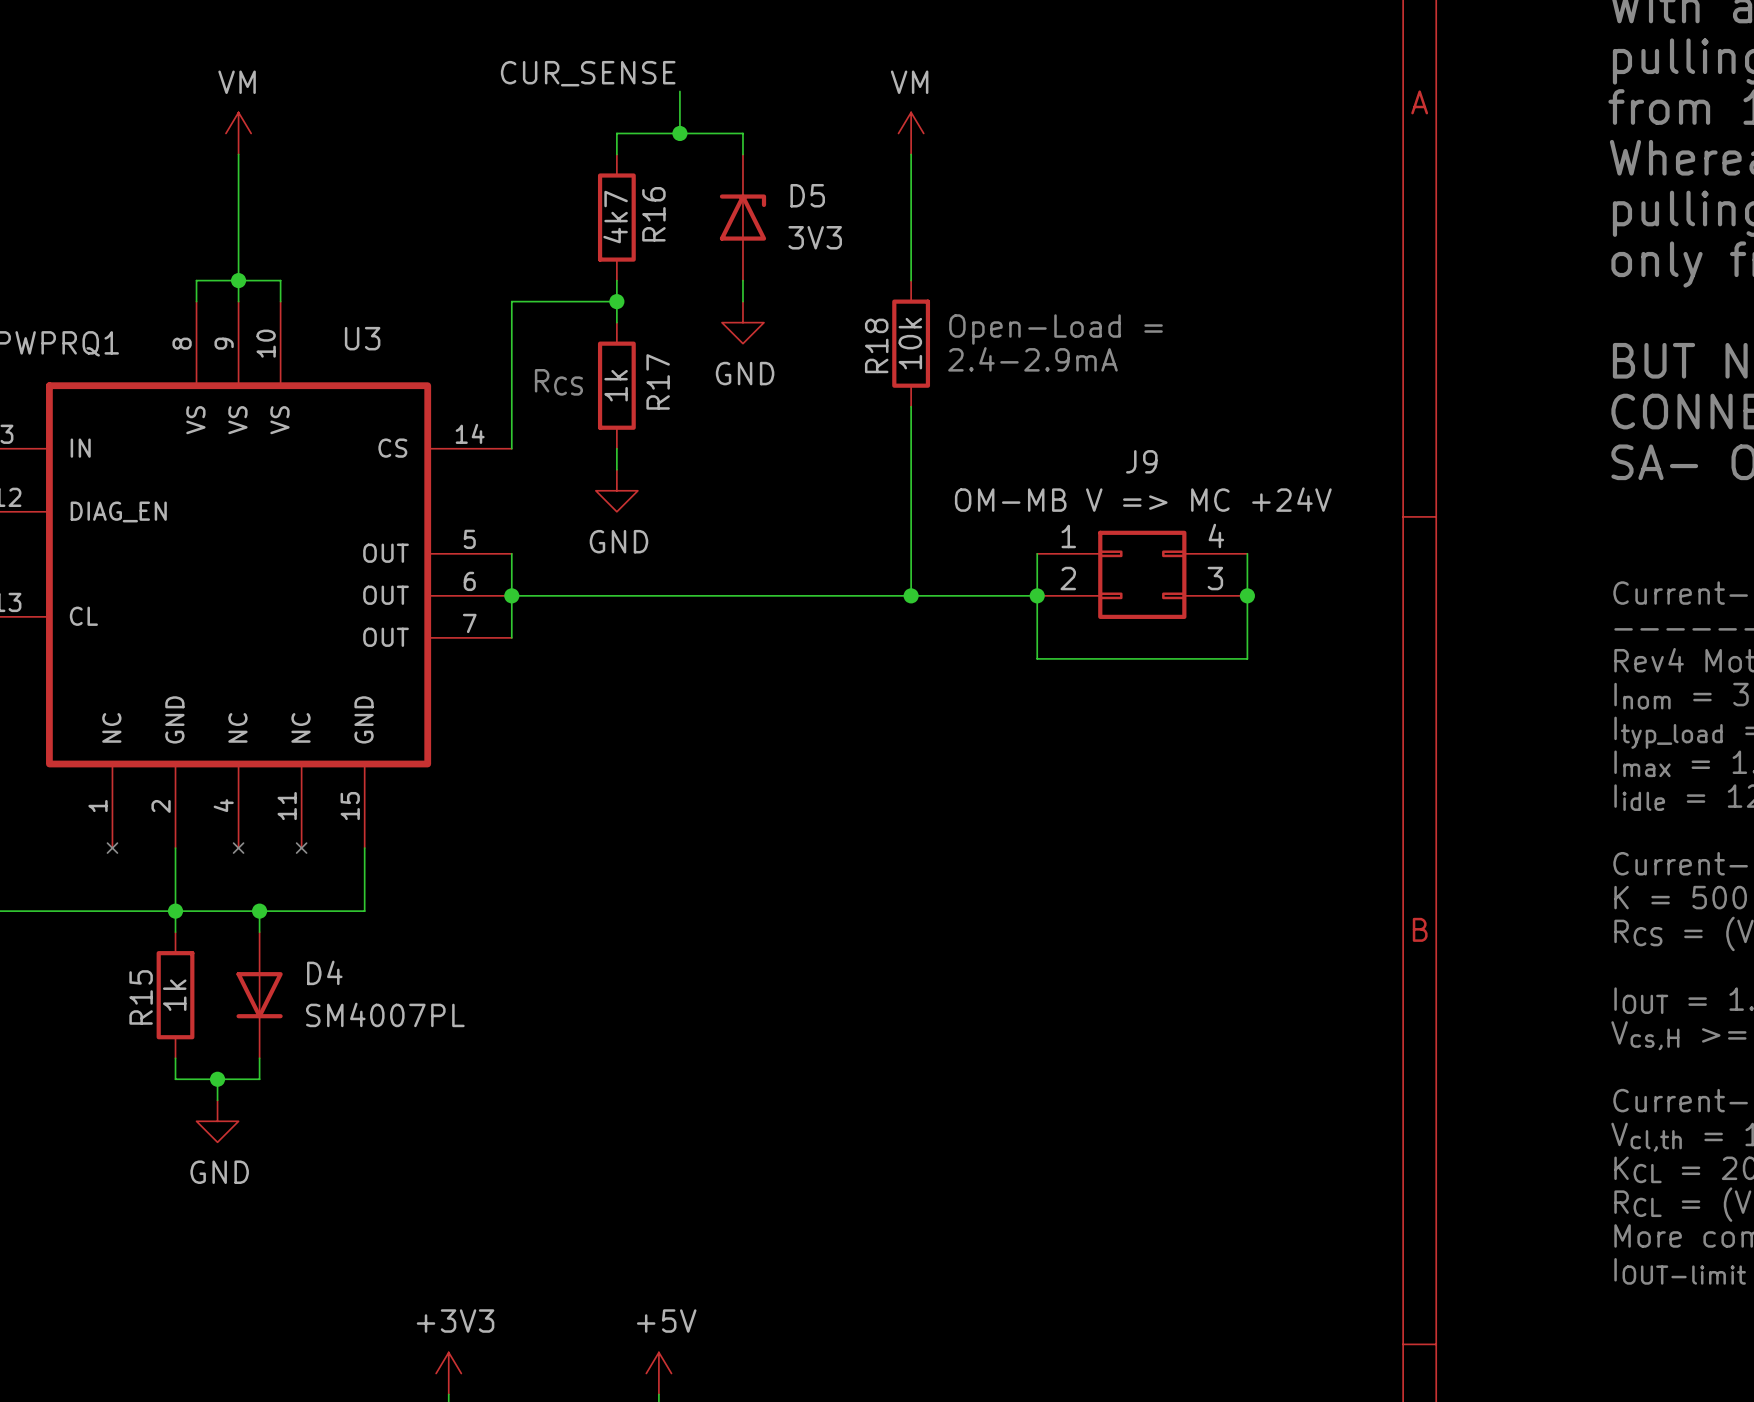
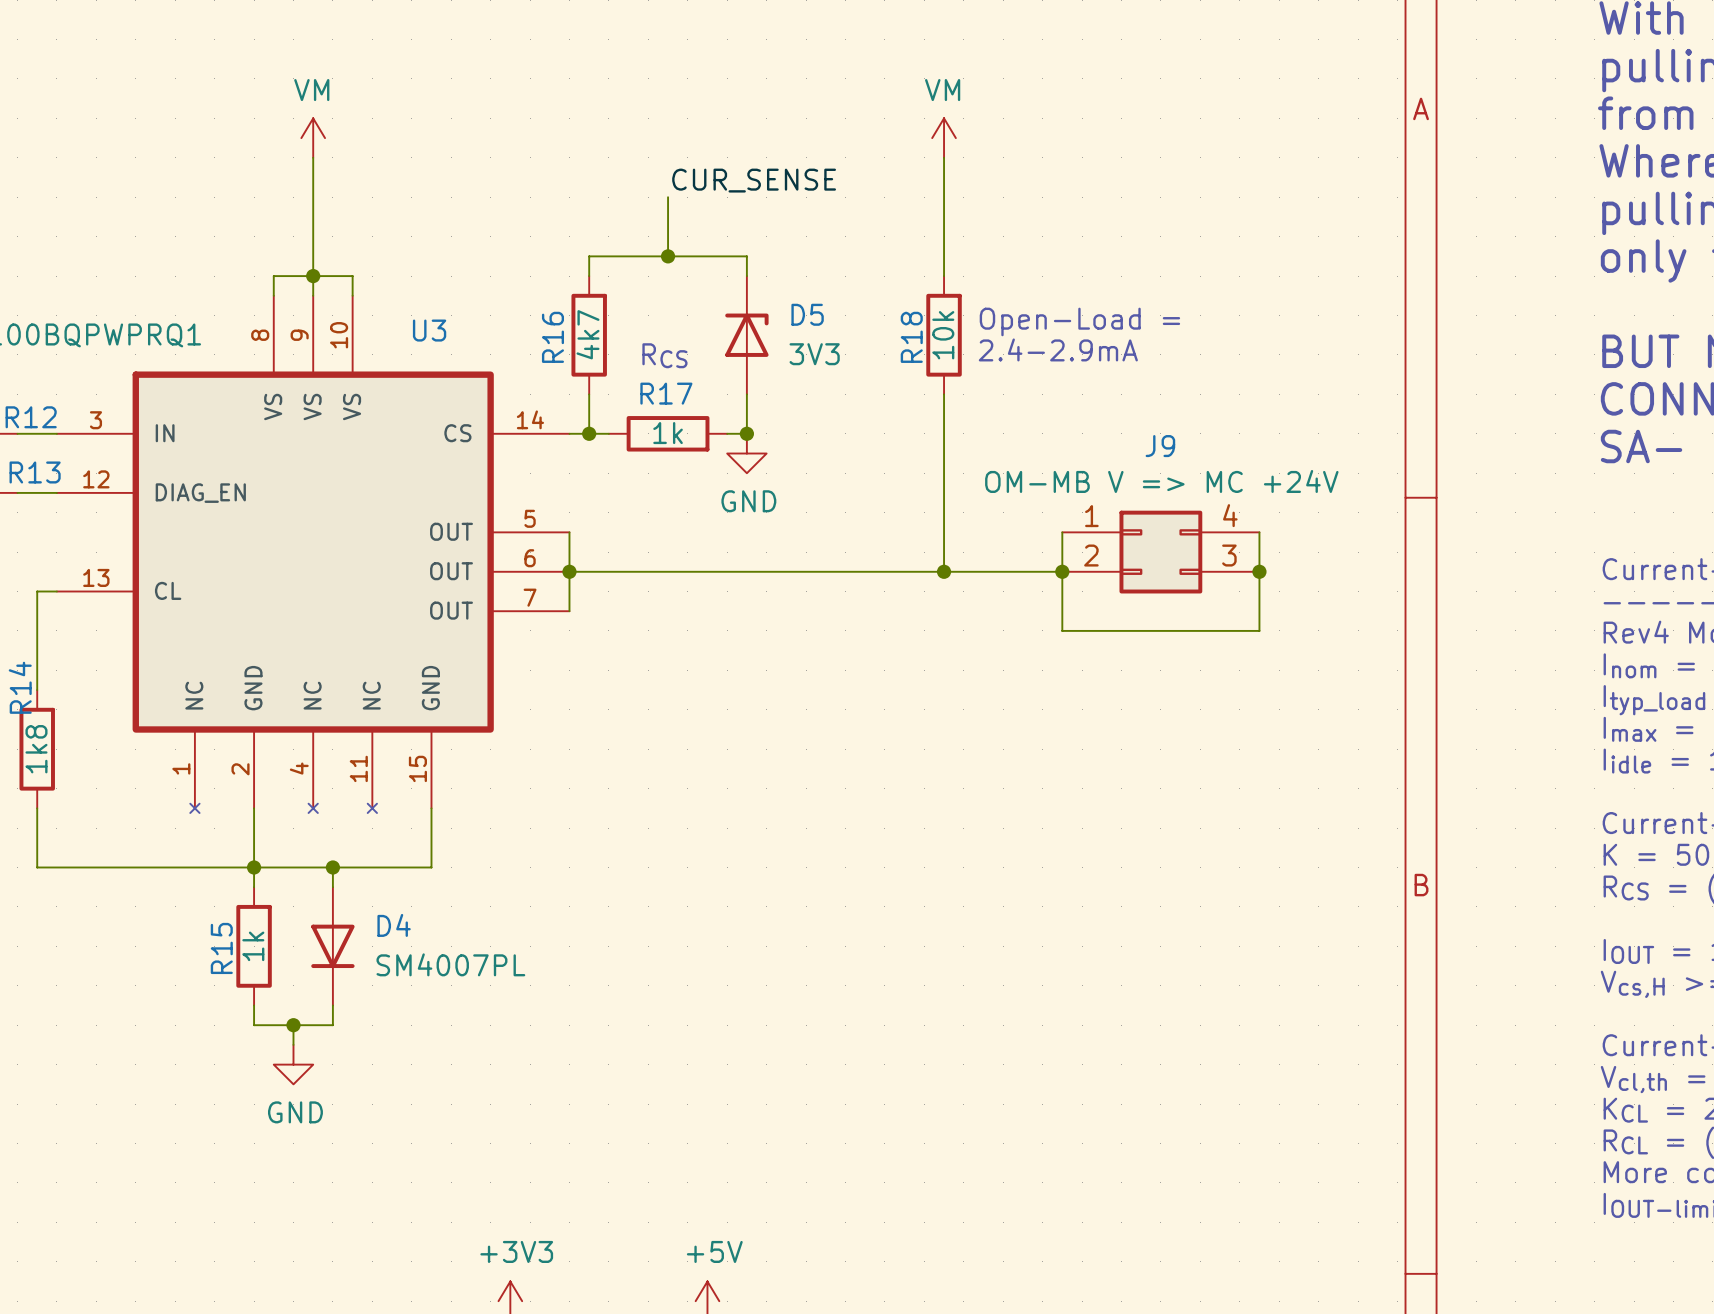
label position: CUR_SENSE (588, 73) -> CUR_SENSE (754, 180)
wire: (679, 91) (679, 133) -> none
junction: (679, 133) -> none
wire: (616, 154) (616, 133) (742, 133) (742, 154) -> none
wire: none -> (668, 197) (668, 256)
R16 name position: R16 (653, 214) -> R16 (552, 337)
R16 position: (616, 217) -> (589, 335)
D5 position: (742, 217) -> (746, 335)
wire: none -> (589, 276) (589, 256) (746, 256) (746, 276)
wire: (616, 280) (616, 322) -> (589, 394) (589, 433)
wire: (742, 280) (742, 301) -> none
wire: (616, 301) (511, 301) (511, 448) -> (608, 433) (569, 433)
junction position: (616, 301) -> (668, 256)
power symbol: GND (742, 322) -> none
R17 name position: R17 (658, 381) -> R17 (666, 393)
text position: RCS (558, 382) -> RCS (664, 355)
R17 rotation: 0° (616, 385) -> 90° clockwise (668, 433)
wire: none -> (746, 394) (746, 433) (727, 433)
junction: none -> (589, 433)
wire: (616, 448) (616, 469) -> none
junction: none -> (746, 433)
power symbol: none -> GND (746, 453)
power symbol: GND (616, 490) -> none

